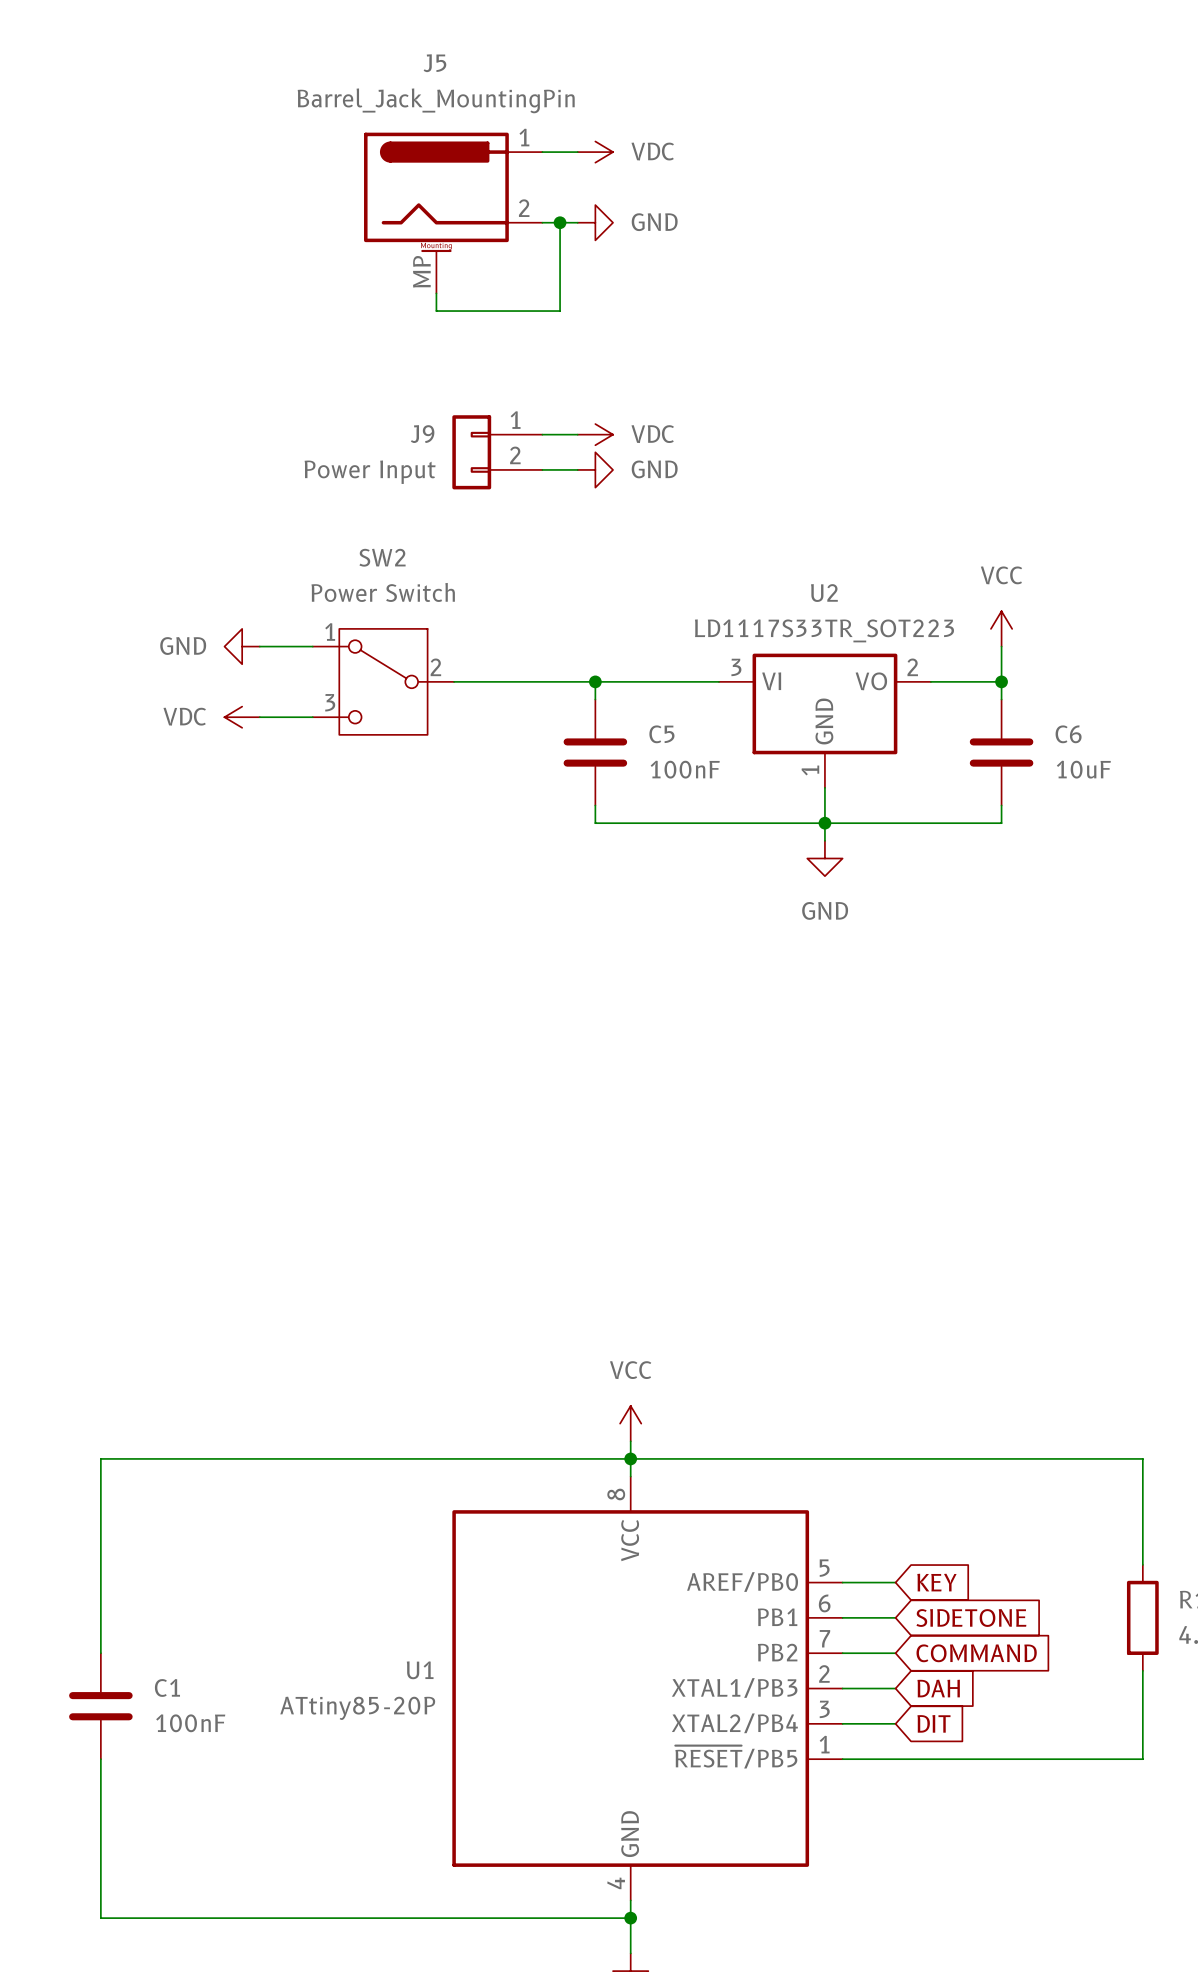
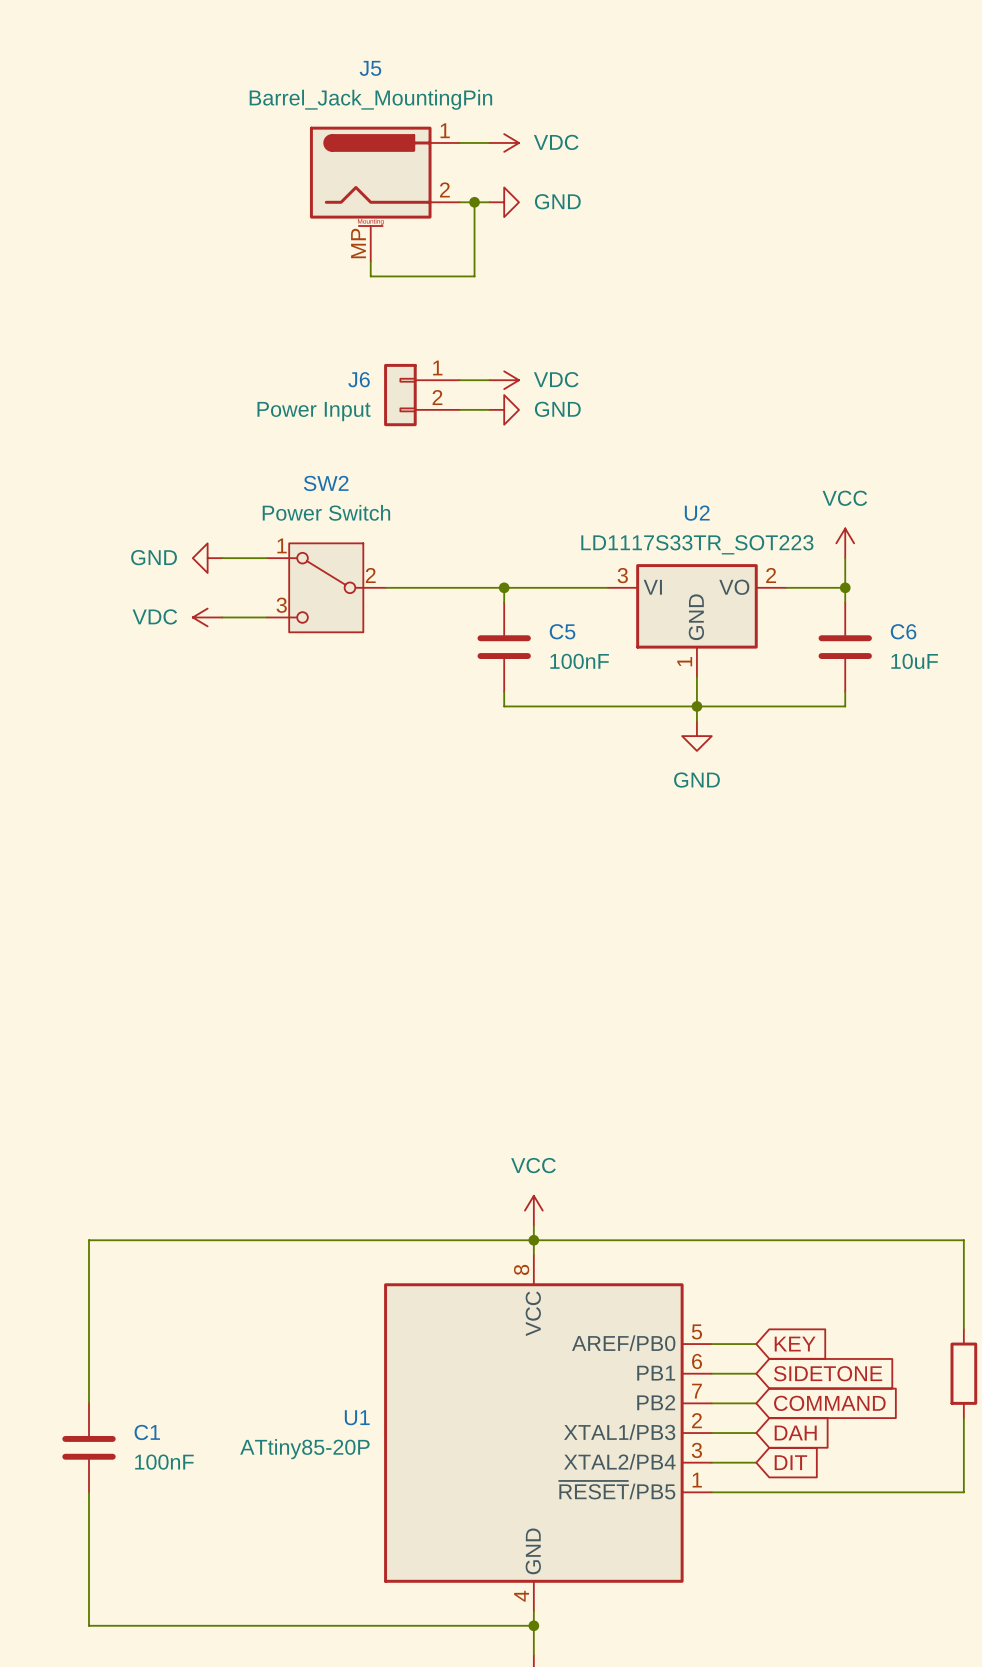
J9 name: J9 (422, 434) -> J6 (359, 379)

